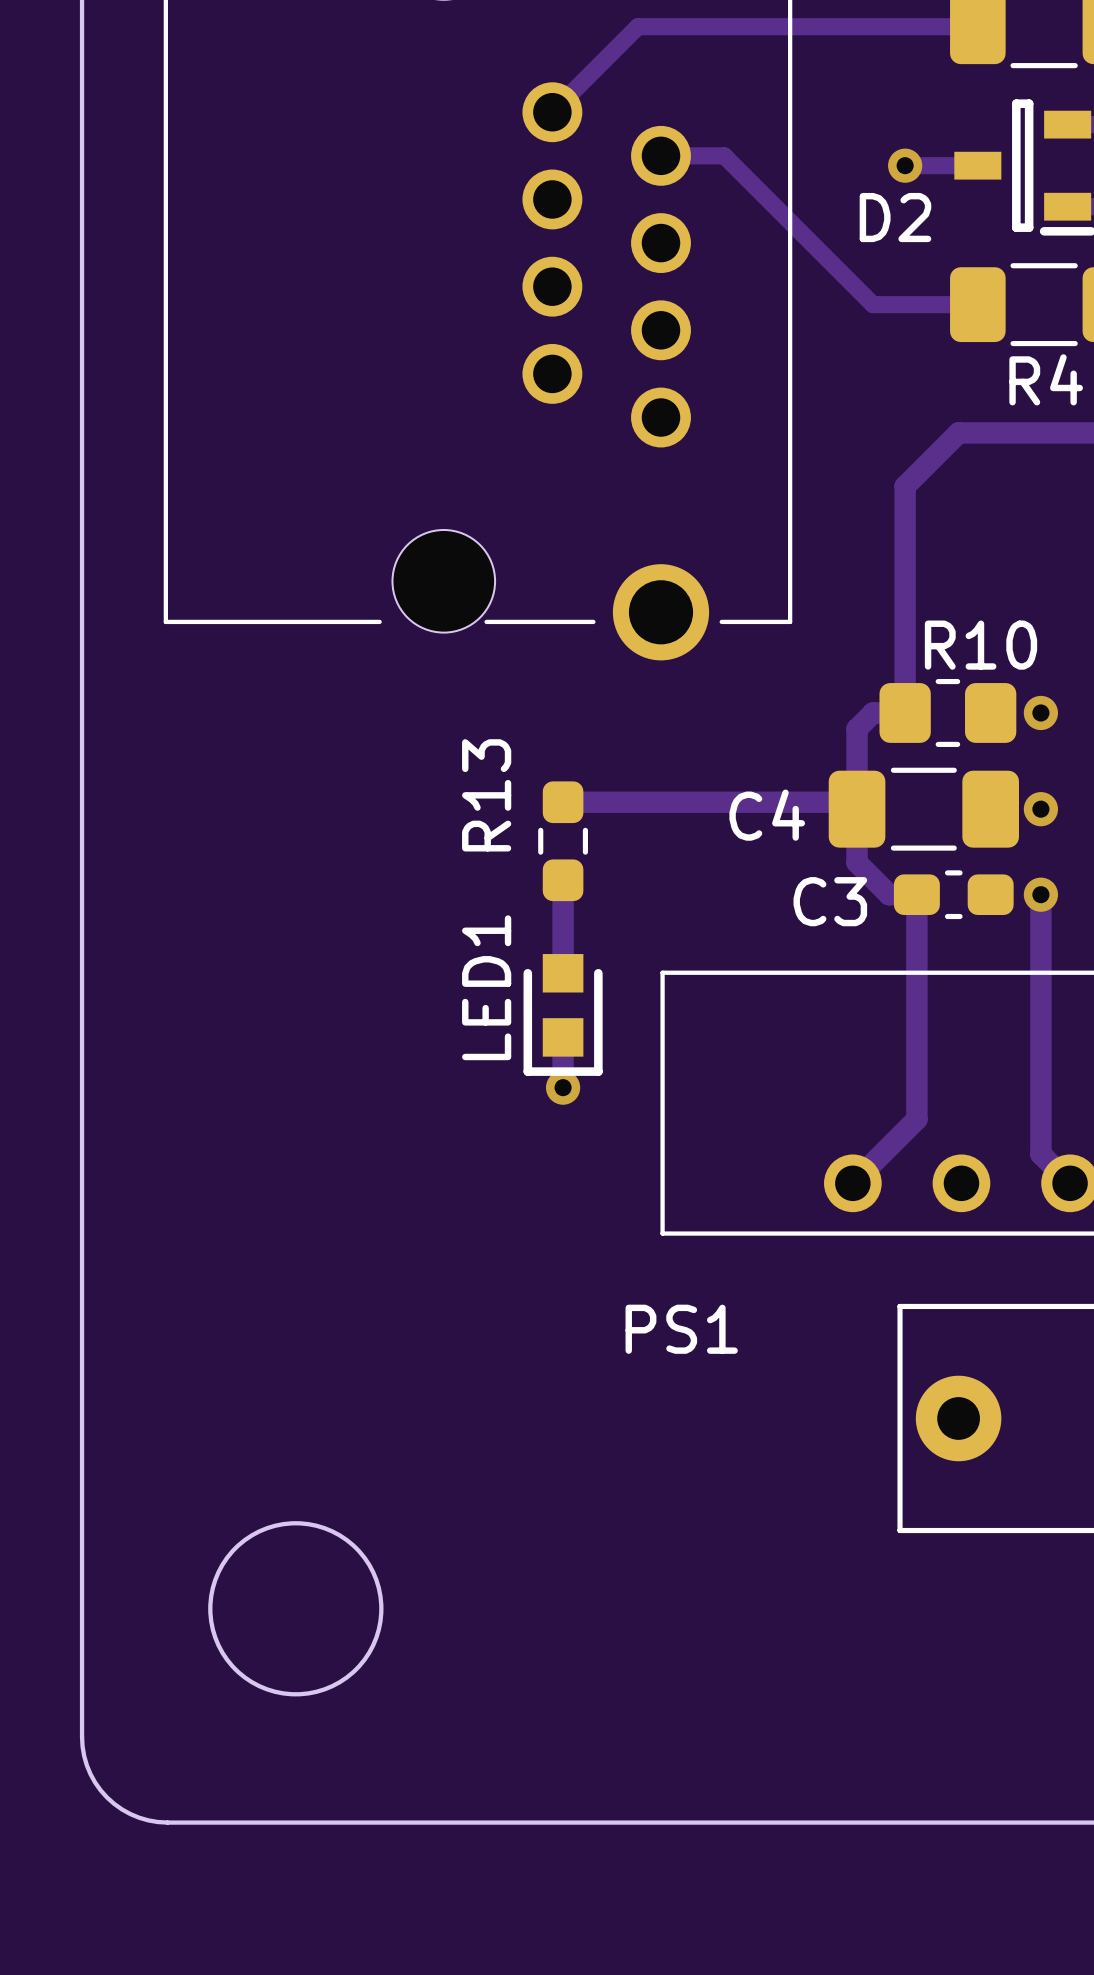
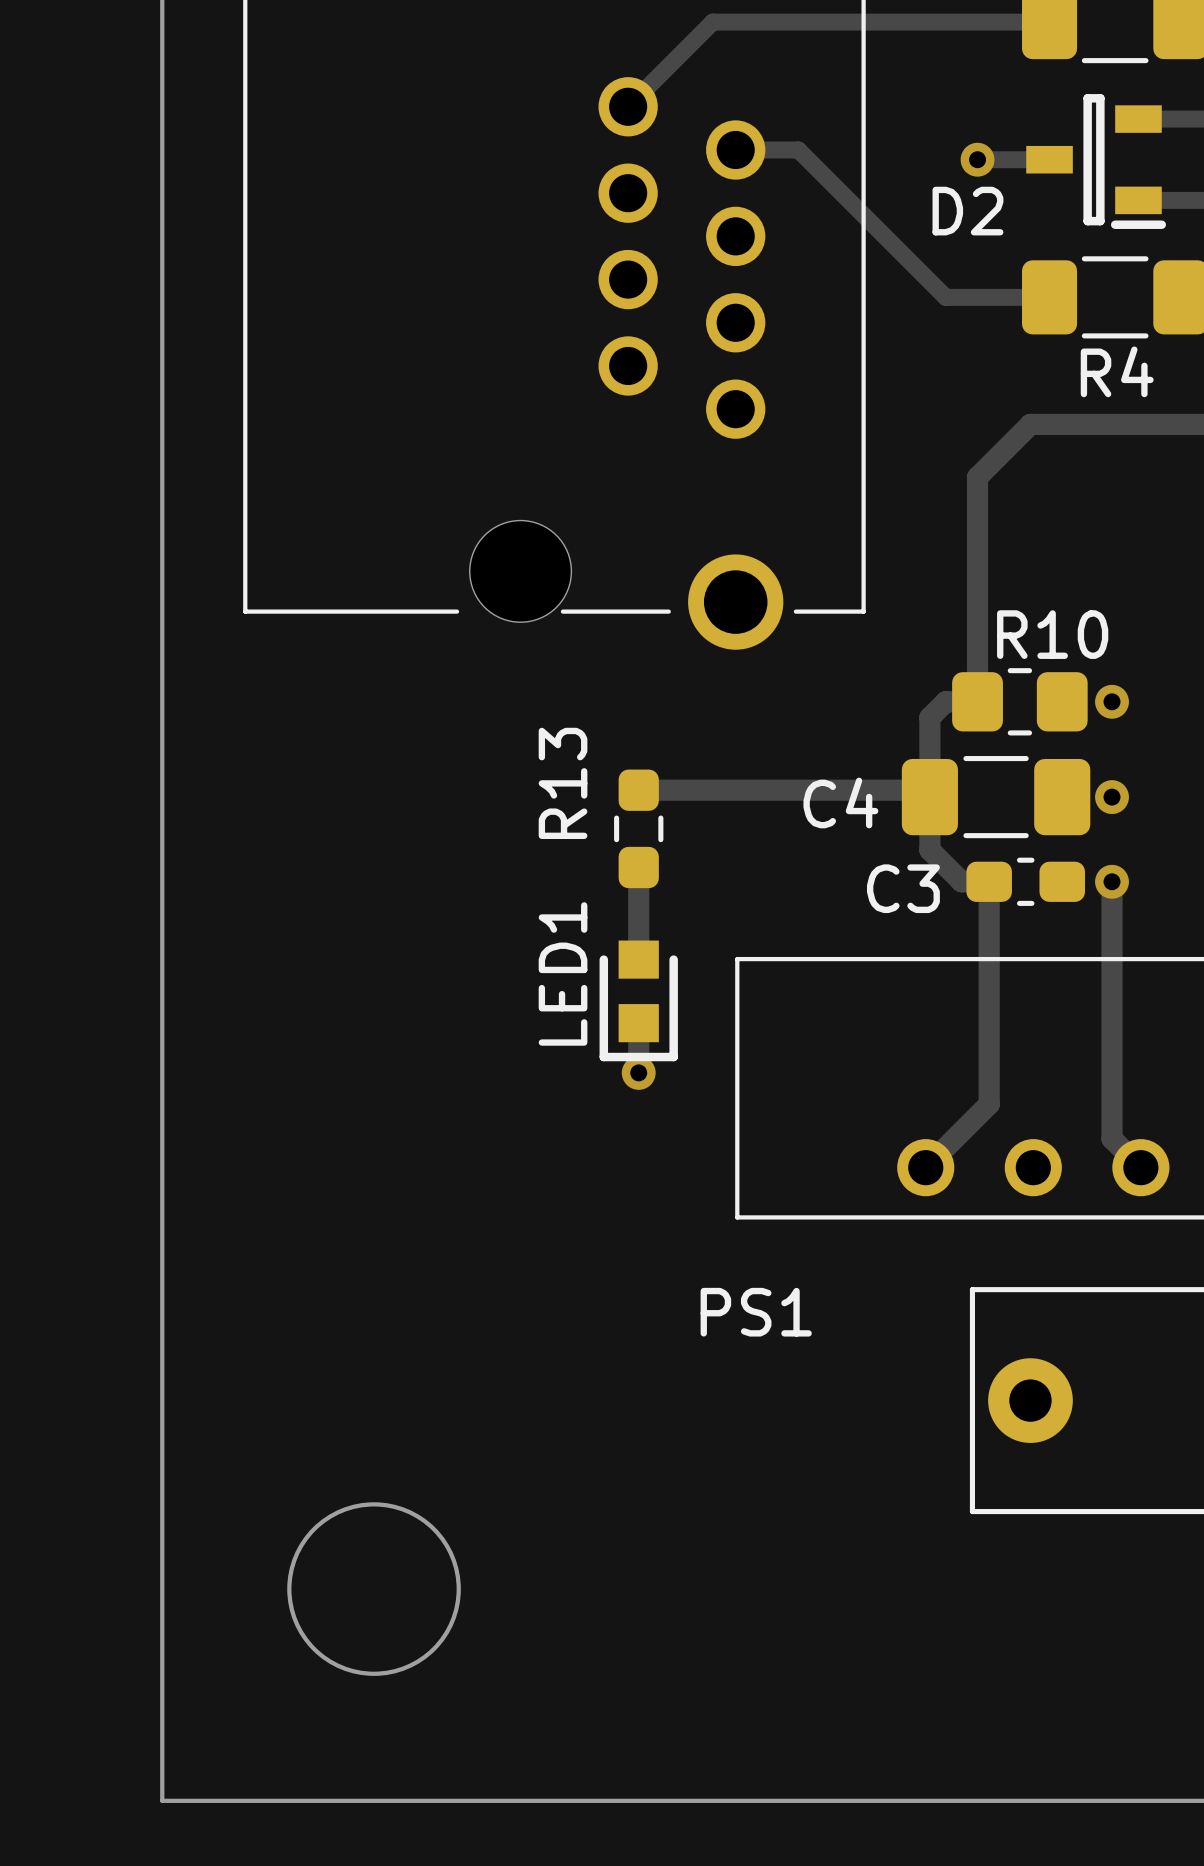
board edge: (82, 1737) (86, 1765) (95, 1782) (107, 1797) (130, 1814) (148, 1820) (167, 1822) -> (162, 1716) (162, 1800) (246, 1800)

